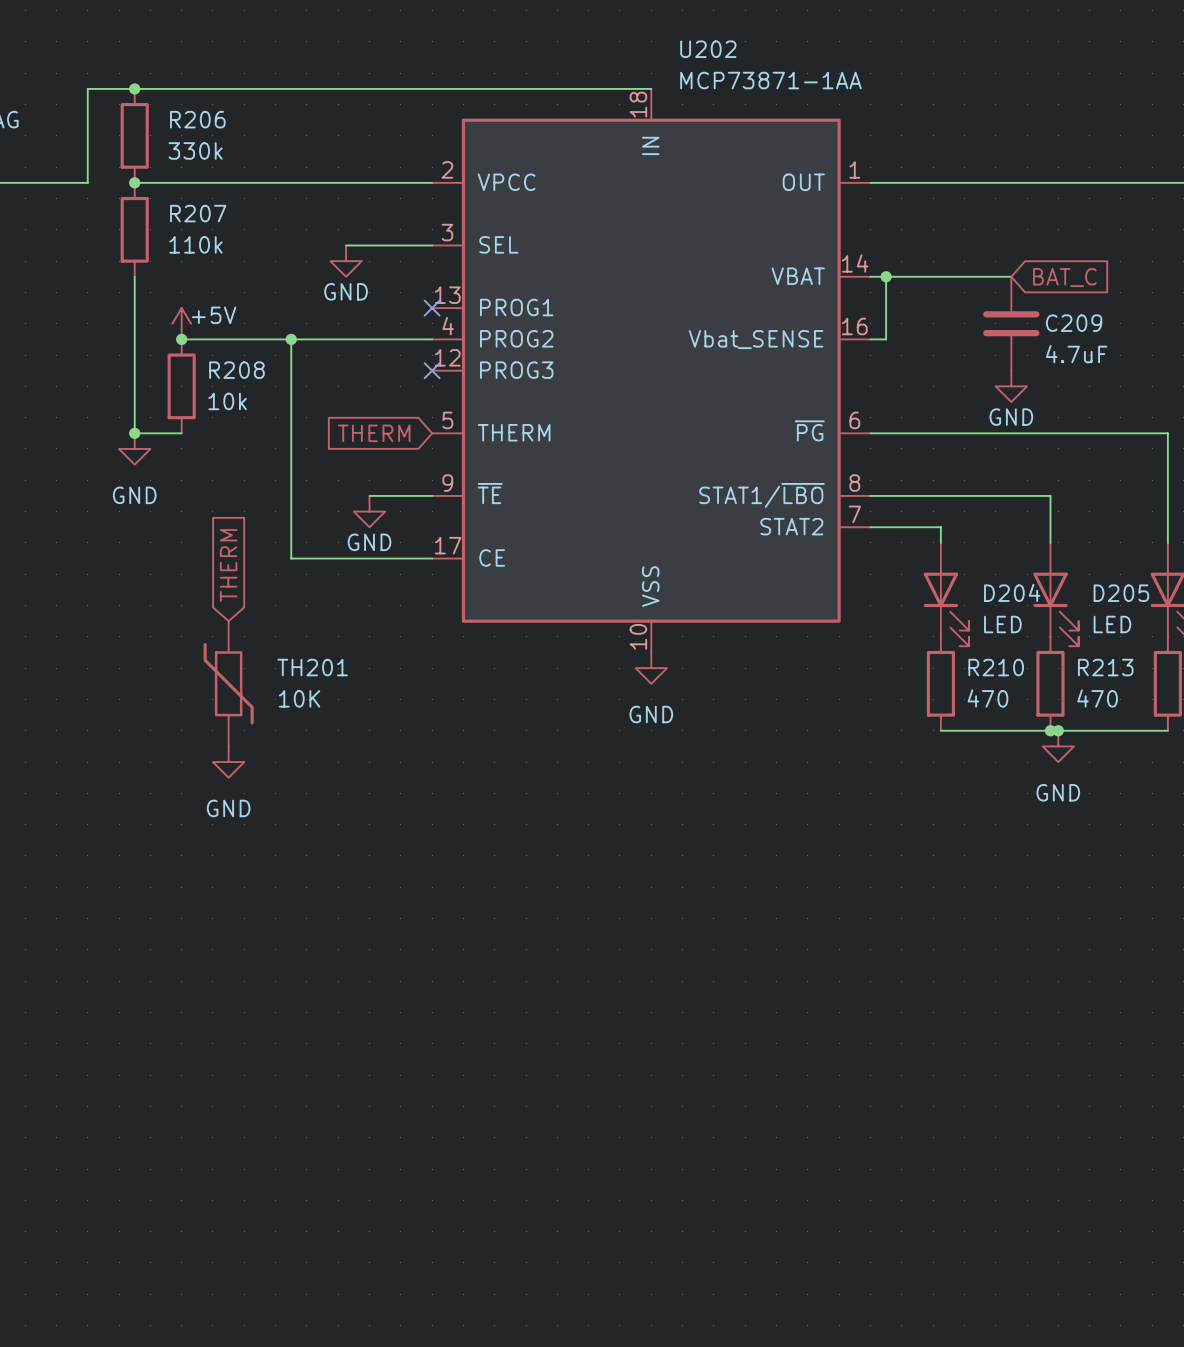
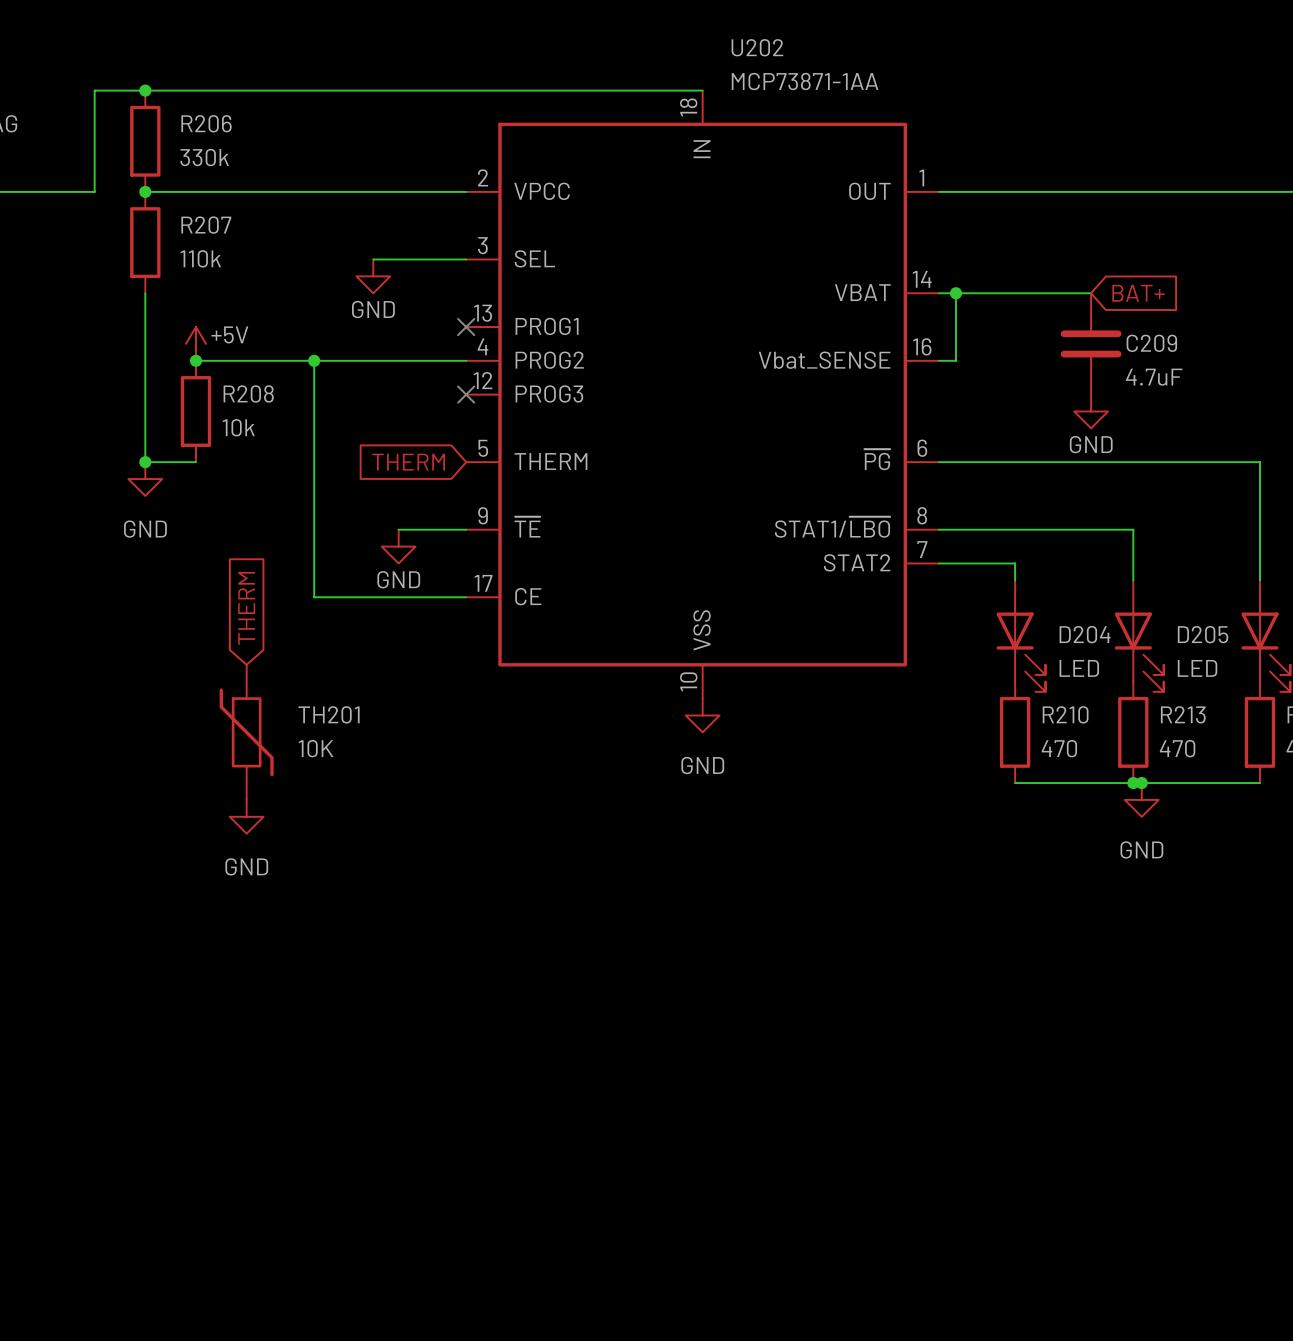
global label: BAT_C (1064, 277) -> BAT+ (1138, 293)

